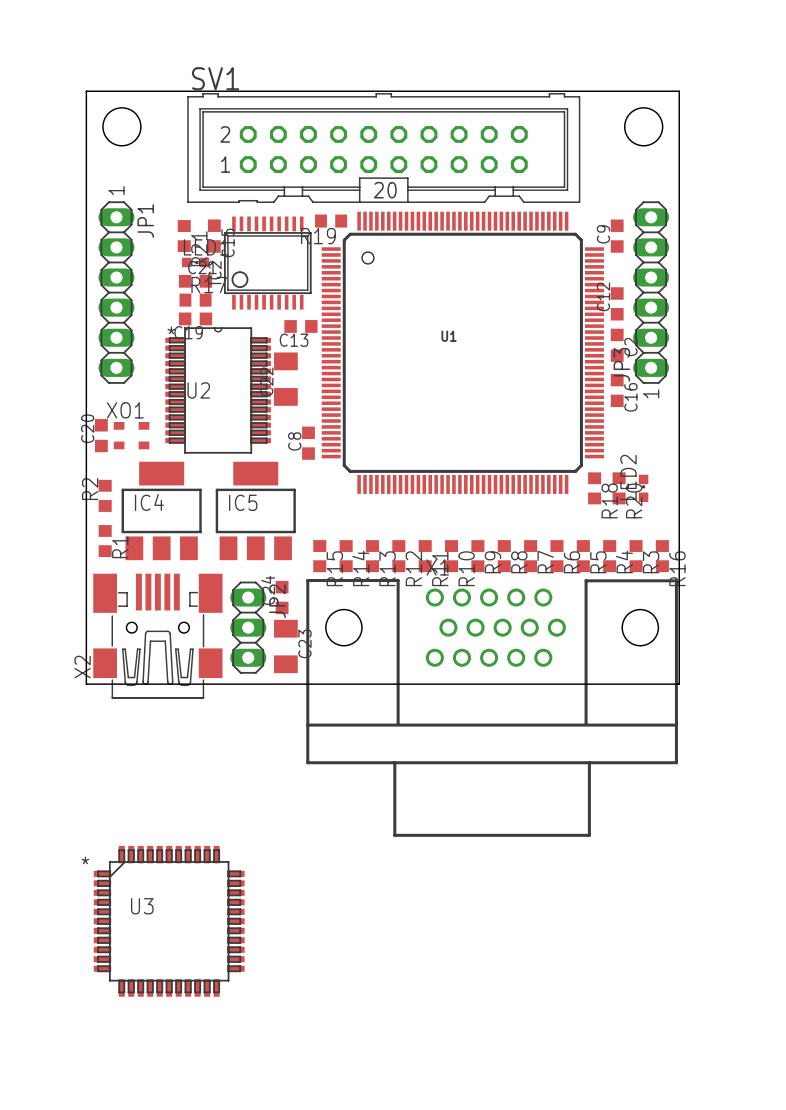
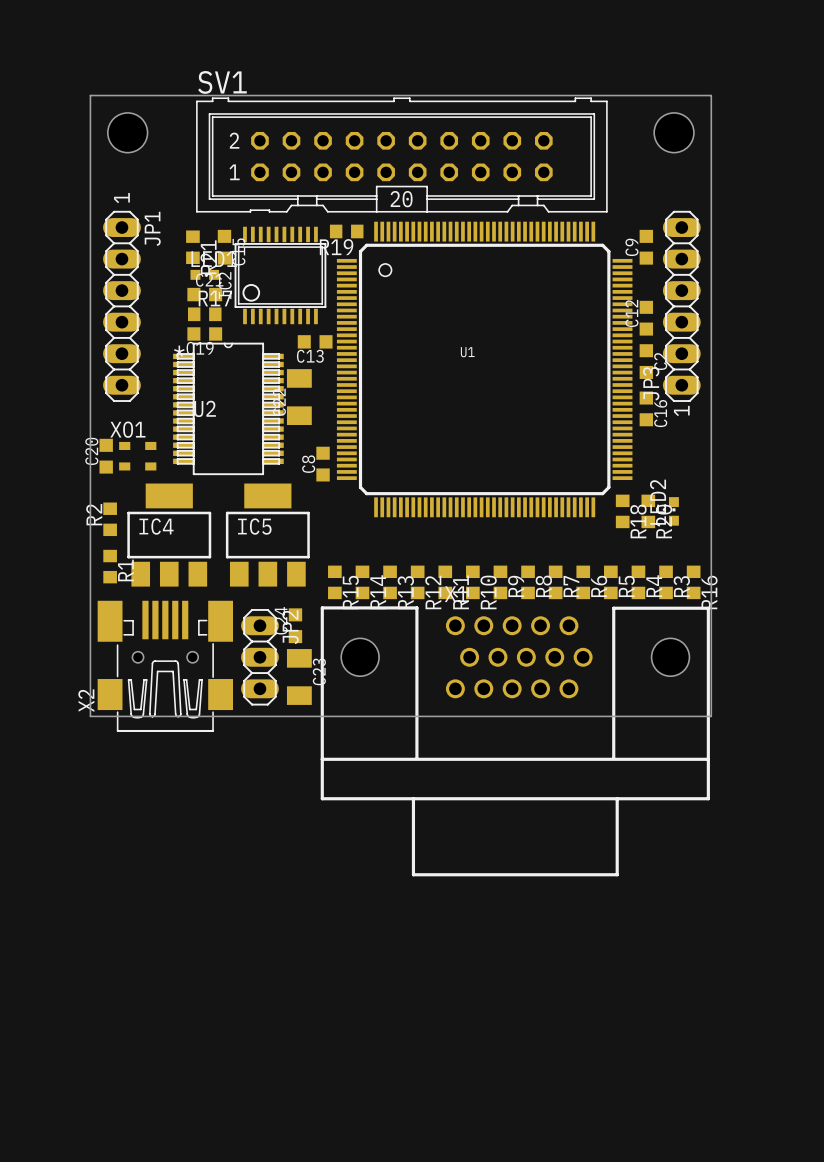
U3: (169, 921) -> none

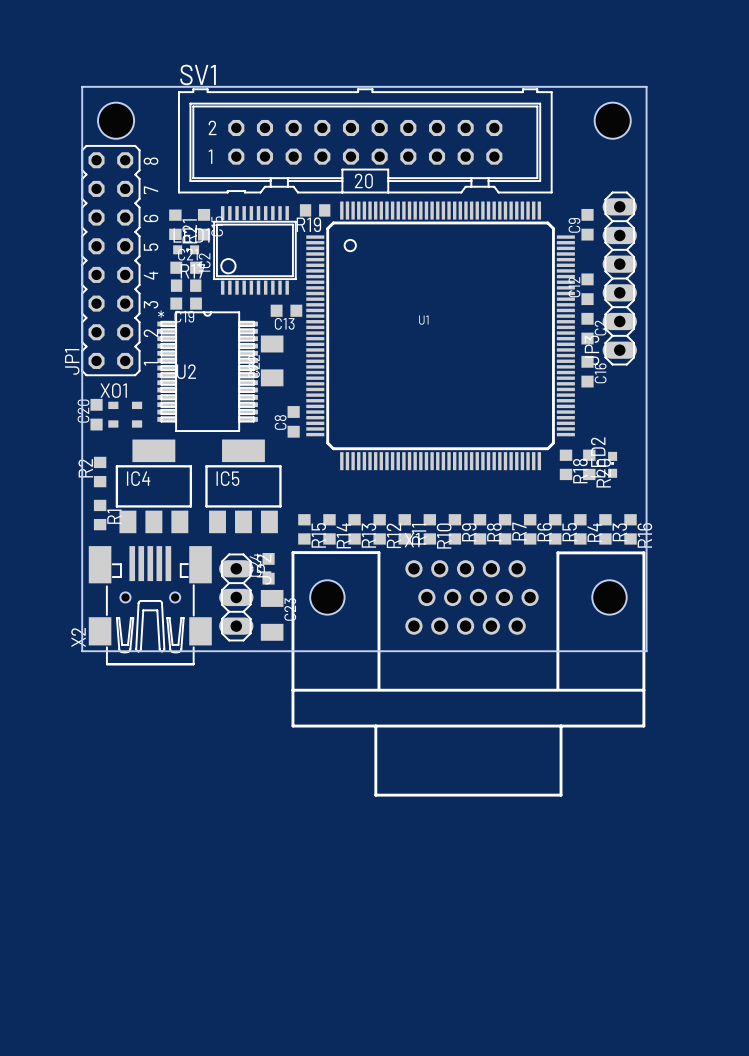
text: 1 (121, 198) -> none
JP1 footprint: [103, 210, 141, 402] -> [81, 145, 141, 377]
JP1 name position: JP1 (152, 228) -> JP1 (72, 361)
text: 1 (681, 410) -> none

